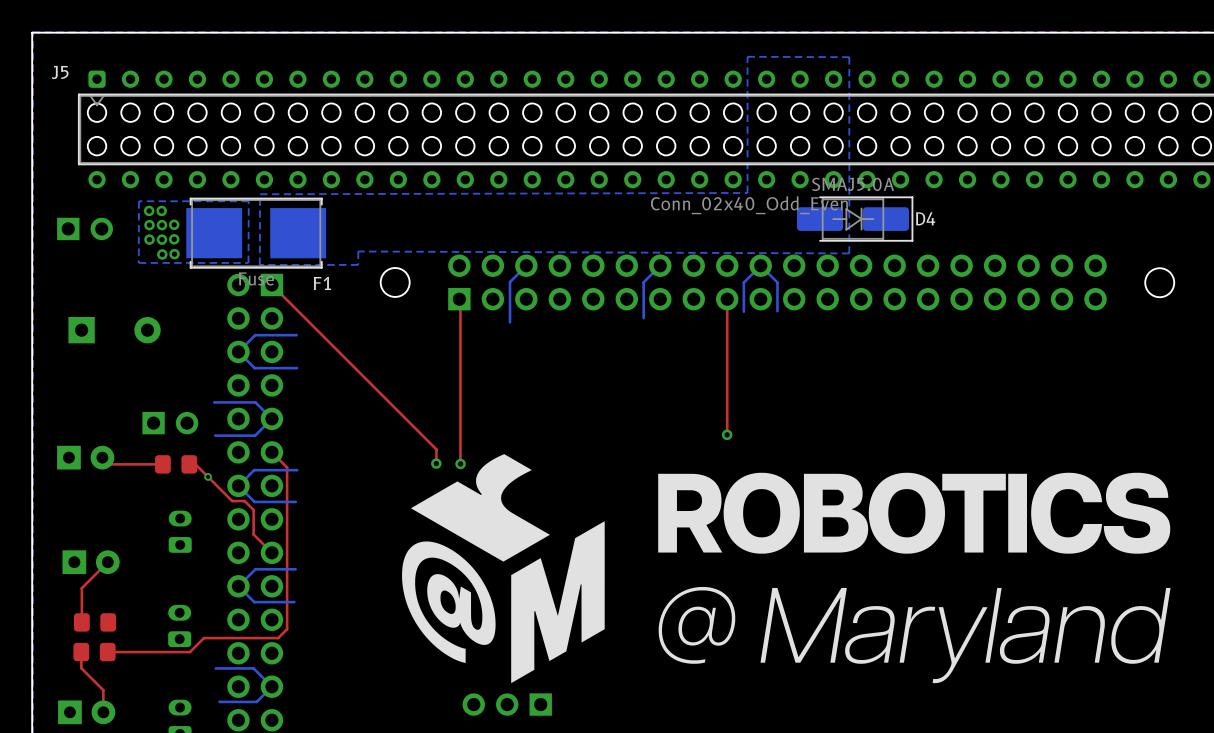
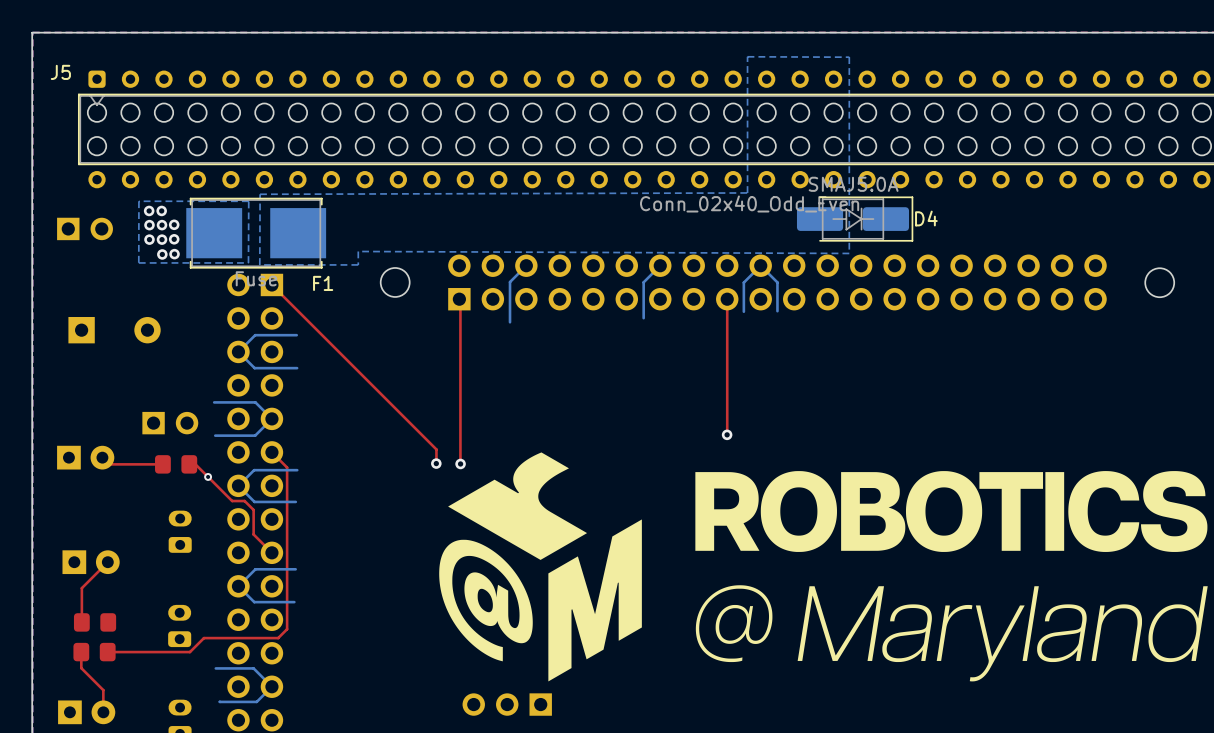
drawing position: (786, 568) -> (823, 566)

